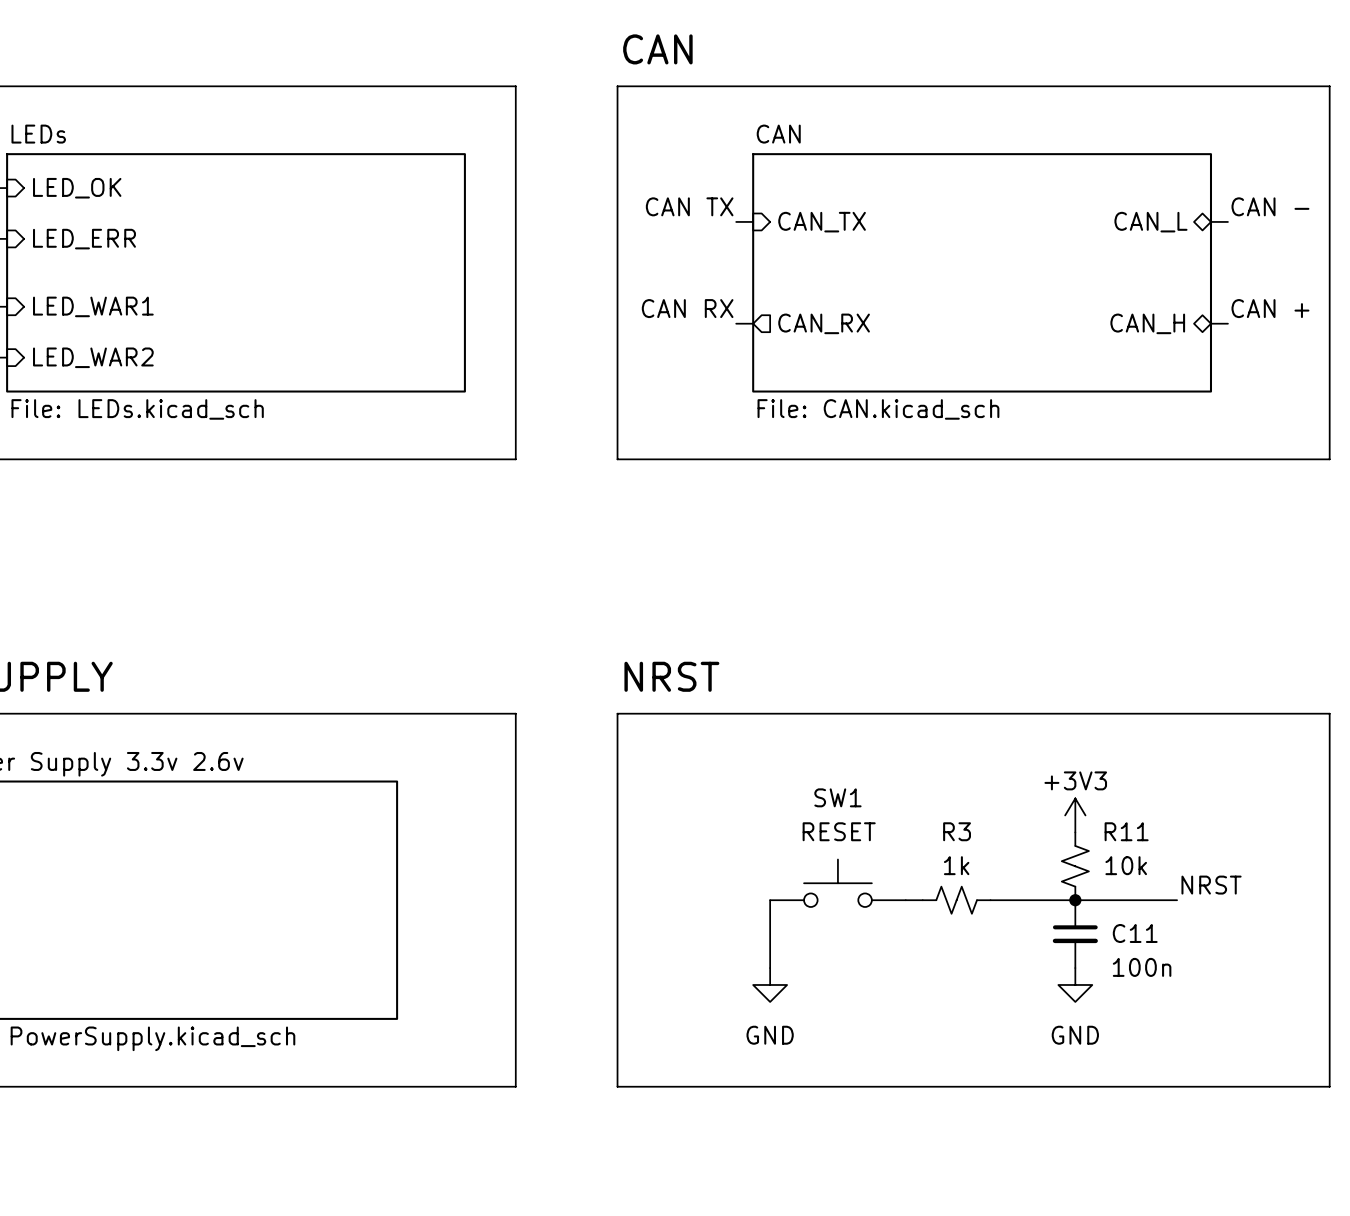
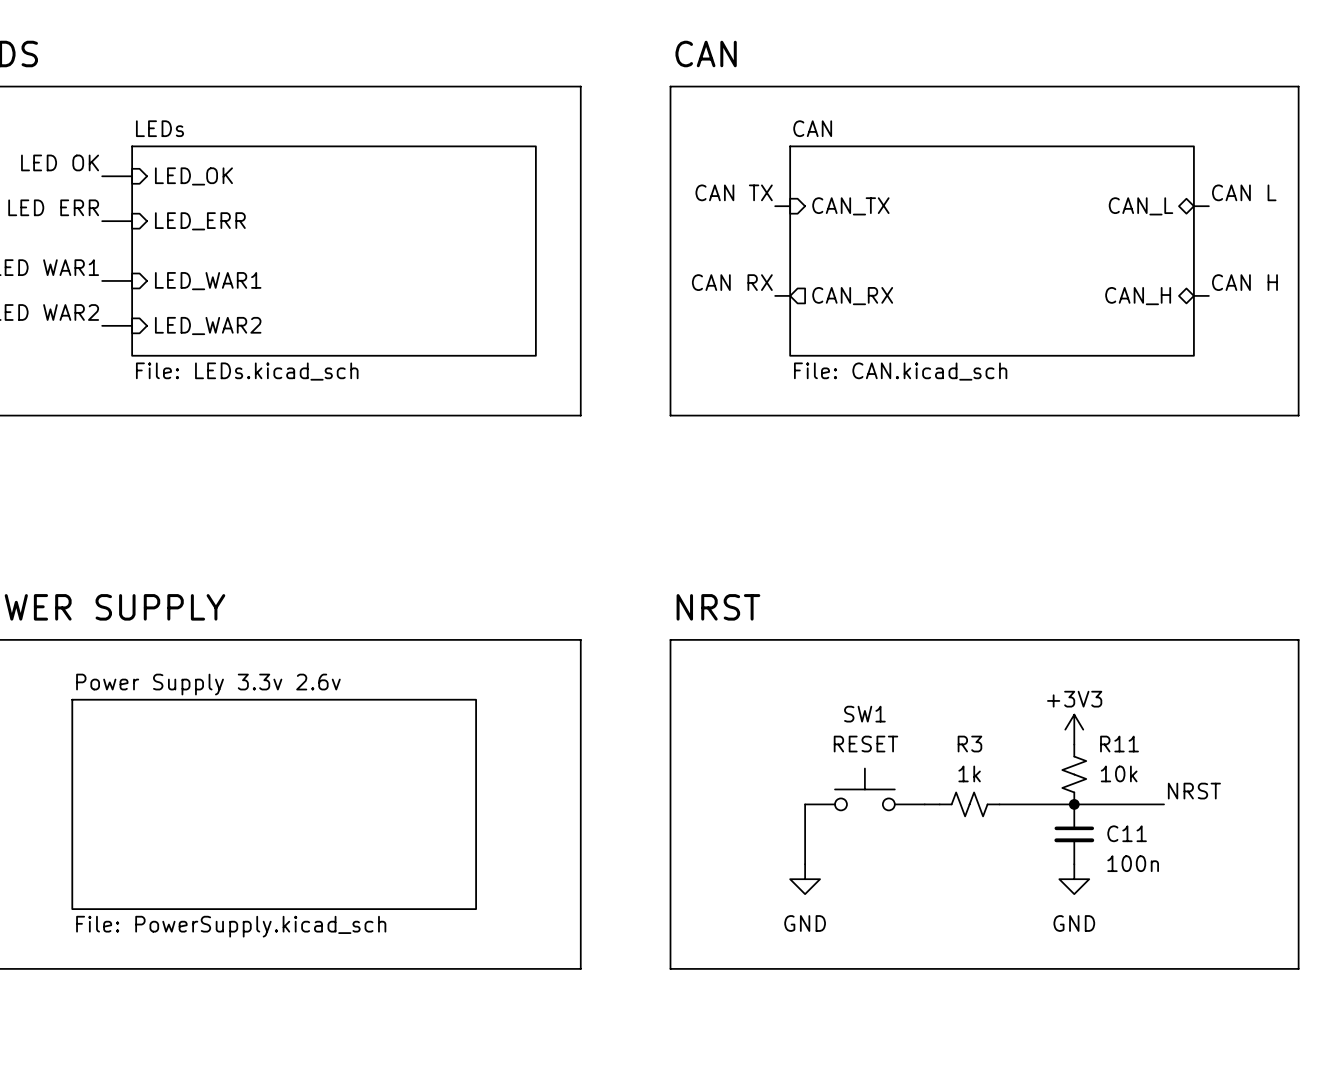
label: CAN - (1270, 206) -> CAN L (1244, 192)
label: CAN + (1270, 308) -> CAN H (1244, 282)

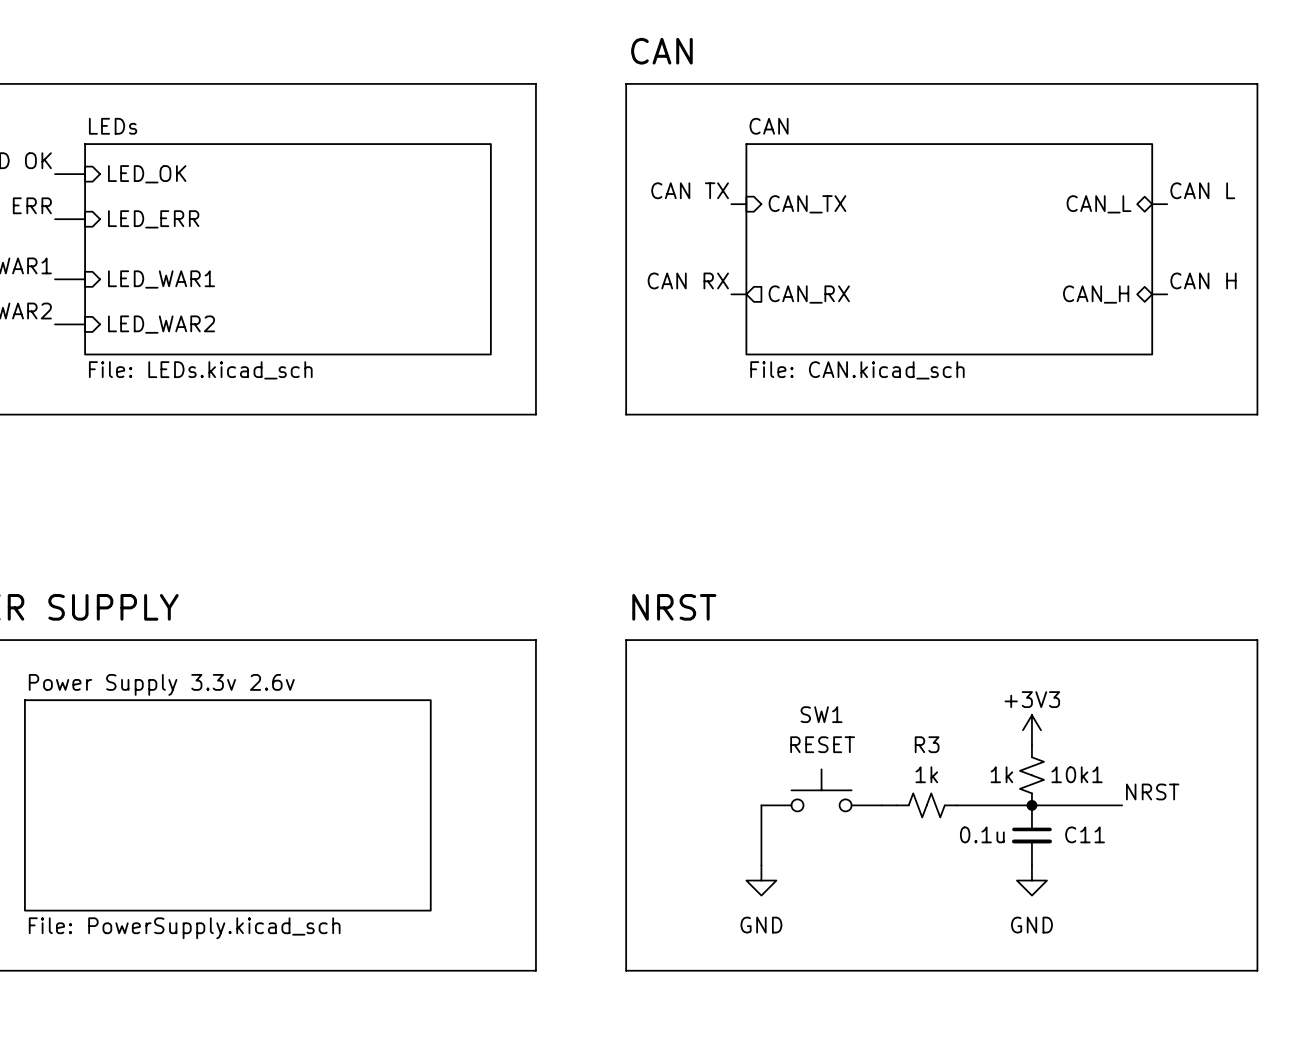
R11 name: R11 (1119, 744) -> 10k1 (1077, 774)
R11 value: 10k (1119, 773) -> 1k (1001, 774)
C11 value: 100n (1133, 863) -> 0.1u (982, 834)

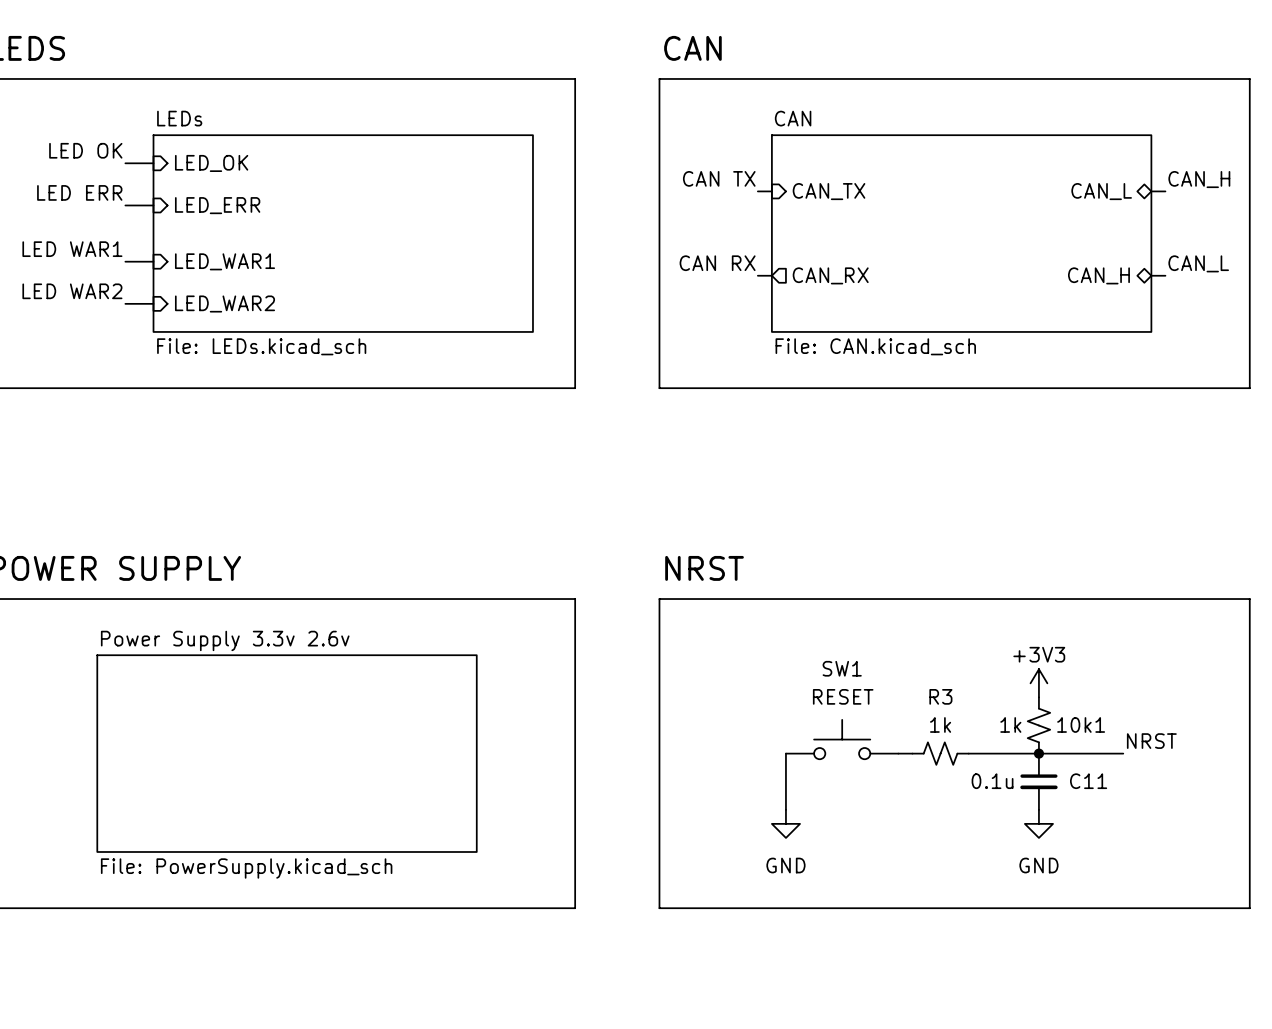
label: CAN L (1202, 190) -> CAN_H (1199, 179)
label: CAN H (1203, 280) -> CAN_L (1198, 263)

